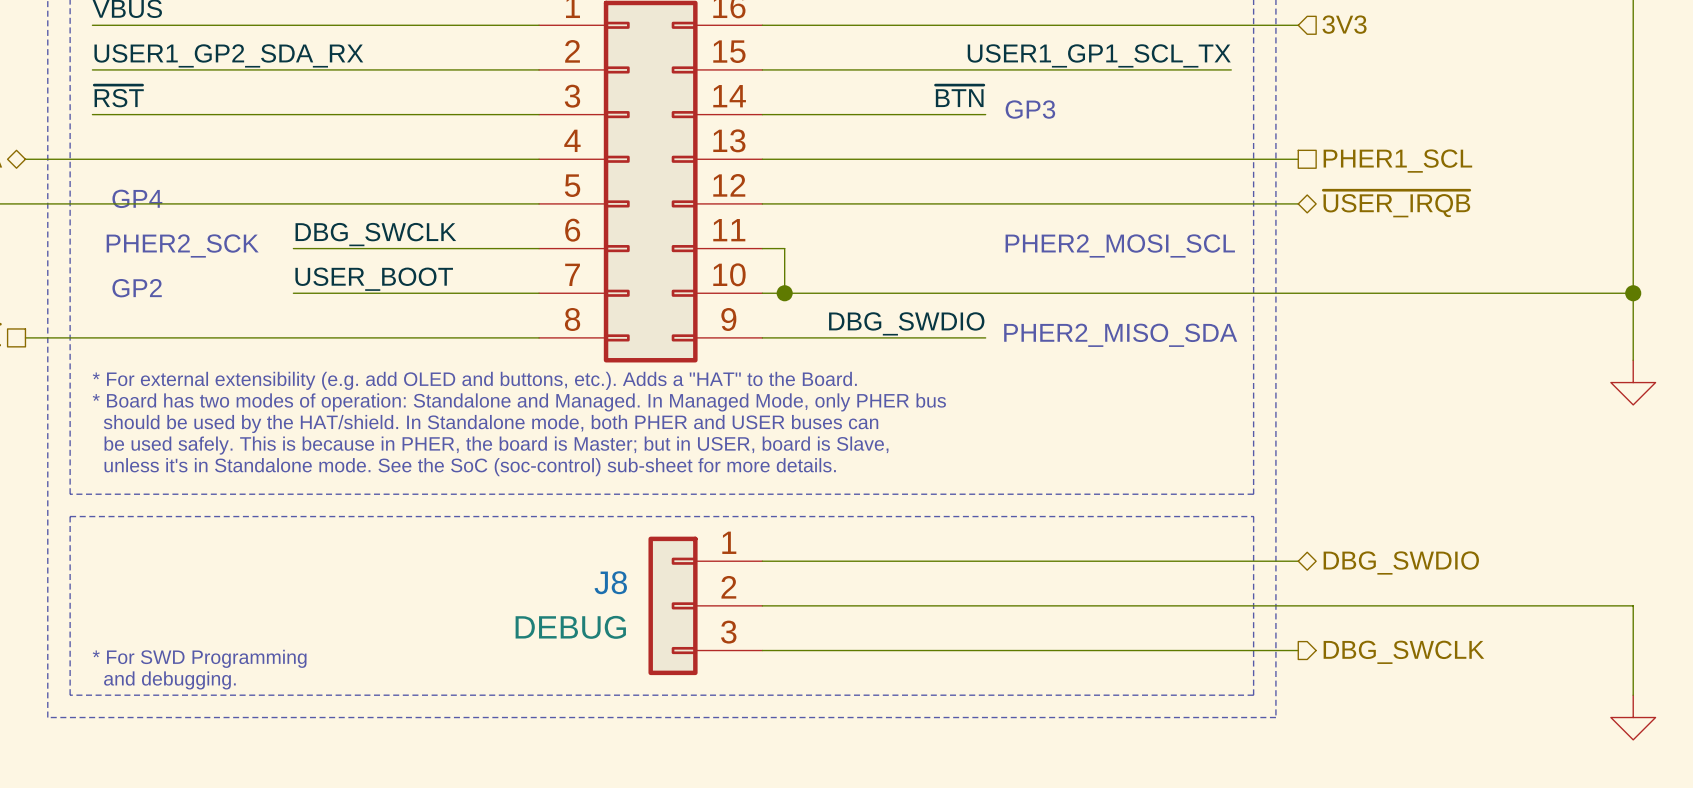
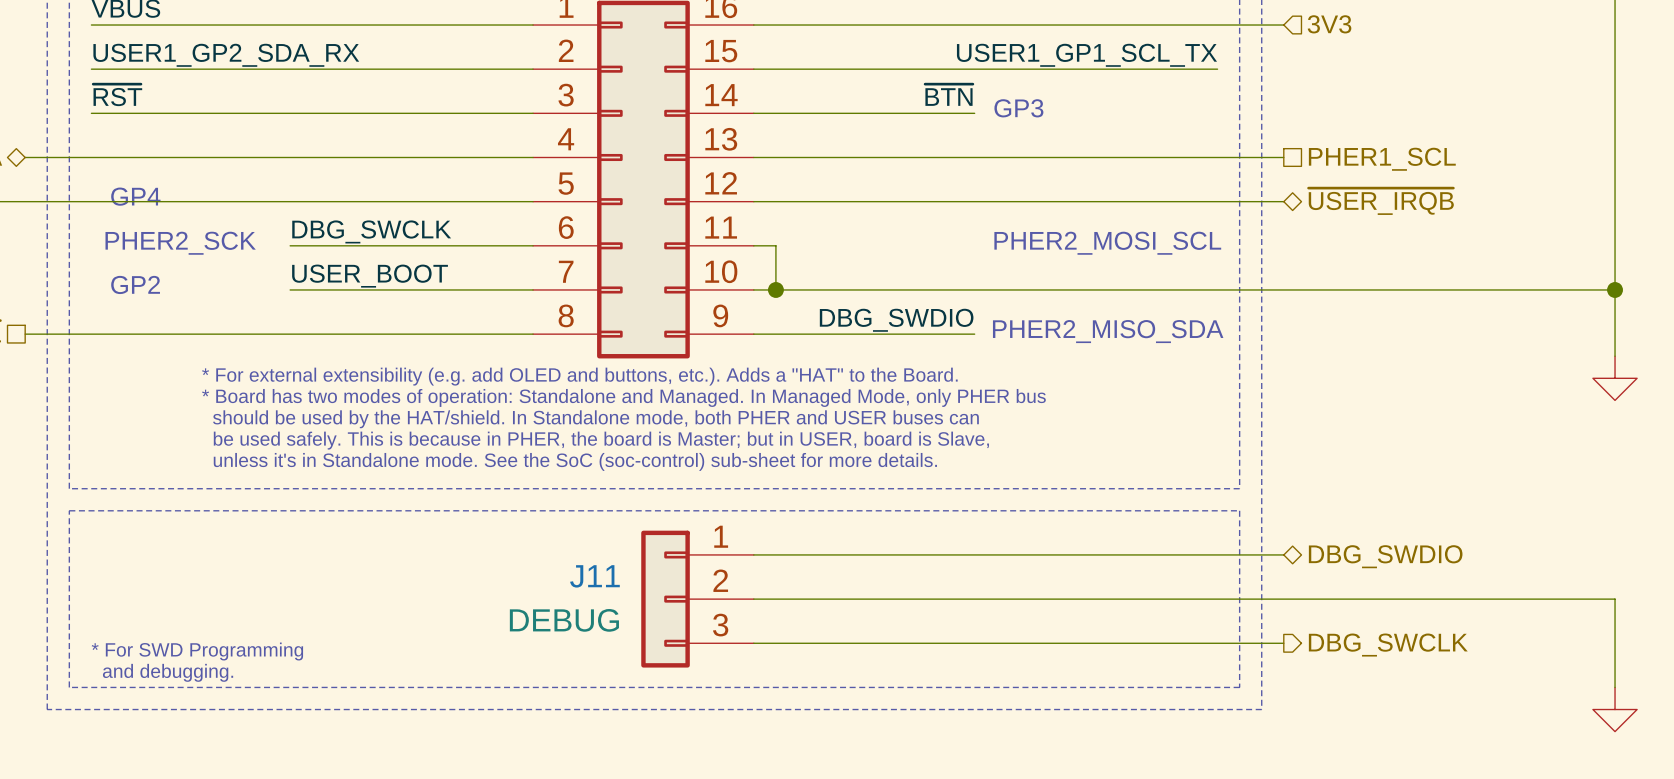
text position: * For external extensibility (e.g. add OLED and buttons, etc.). Adds a "HAT" to the Board. (474, 380) -> * For external extensibility (e.g. add OLED and buttons, etc.). Adds a "HAT" to the Board. (579, 376)
text position: * Board has two modes of operation: Standalone and Managed. In Managed Mode, only PHER bus (519, 402) -> * Board has two modes of operation: Standalone and Managed. In Managed Mode, only PHER bus (623, 397)
text position: should be used by the HAT/shield. In Standalone mode, both PHER and USER buses can (491, 424) -> should be used by the HAT/shield. In Standalone mode, both PHER and USER buses can (595, 419)
text position: be used safely. This is because in PHER, the board is Master; but in USER, board is Slave, (496, 445) -> be used safely. This is because in PHER, the board is Master; but in USER, board is Slave, (601, 440)
text position: unless it's in Standalone mode. See the SoC (soc-control) sub-sheet for more details. (470, 467) -> unless it's in Standalone mode. See the SoC (soc-control) sub-sheet for more details. (575, 461)
J8 name: J8 (610, 582) -> J11 (594, 576)

